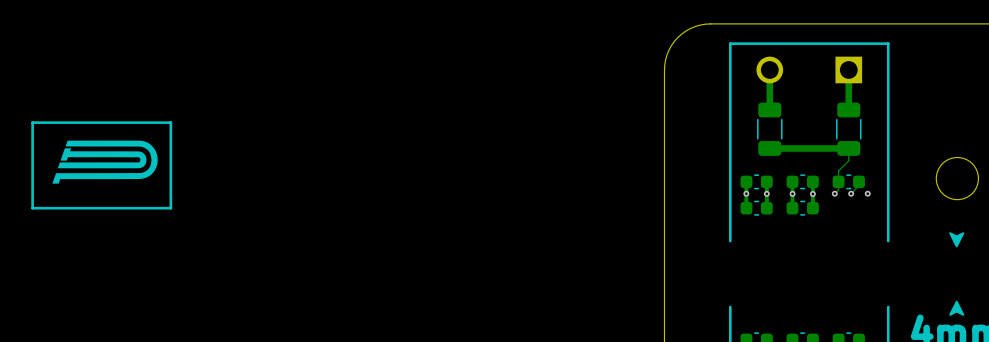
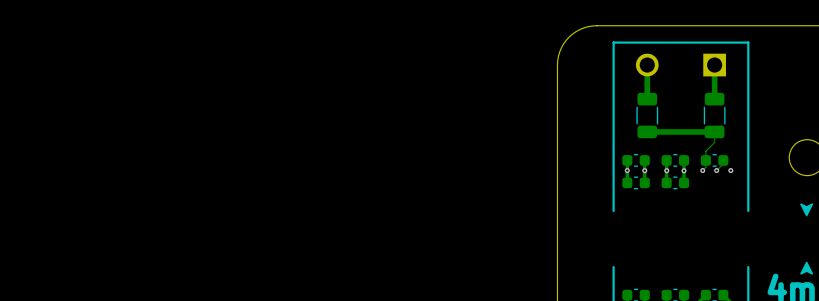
line: (170, 122) (32, 122) (32, 208) (170, 208) (170, 122) -> none
drawing: [52, 140, 158, 184] -> none

